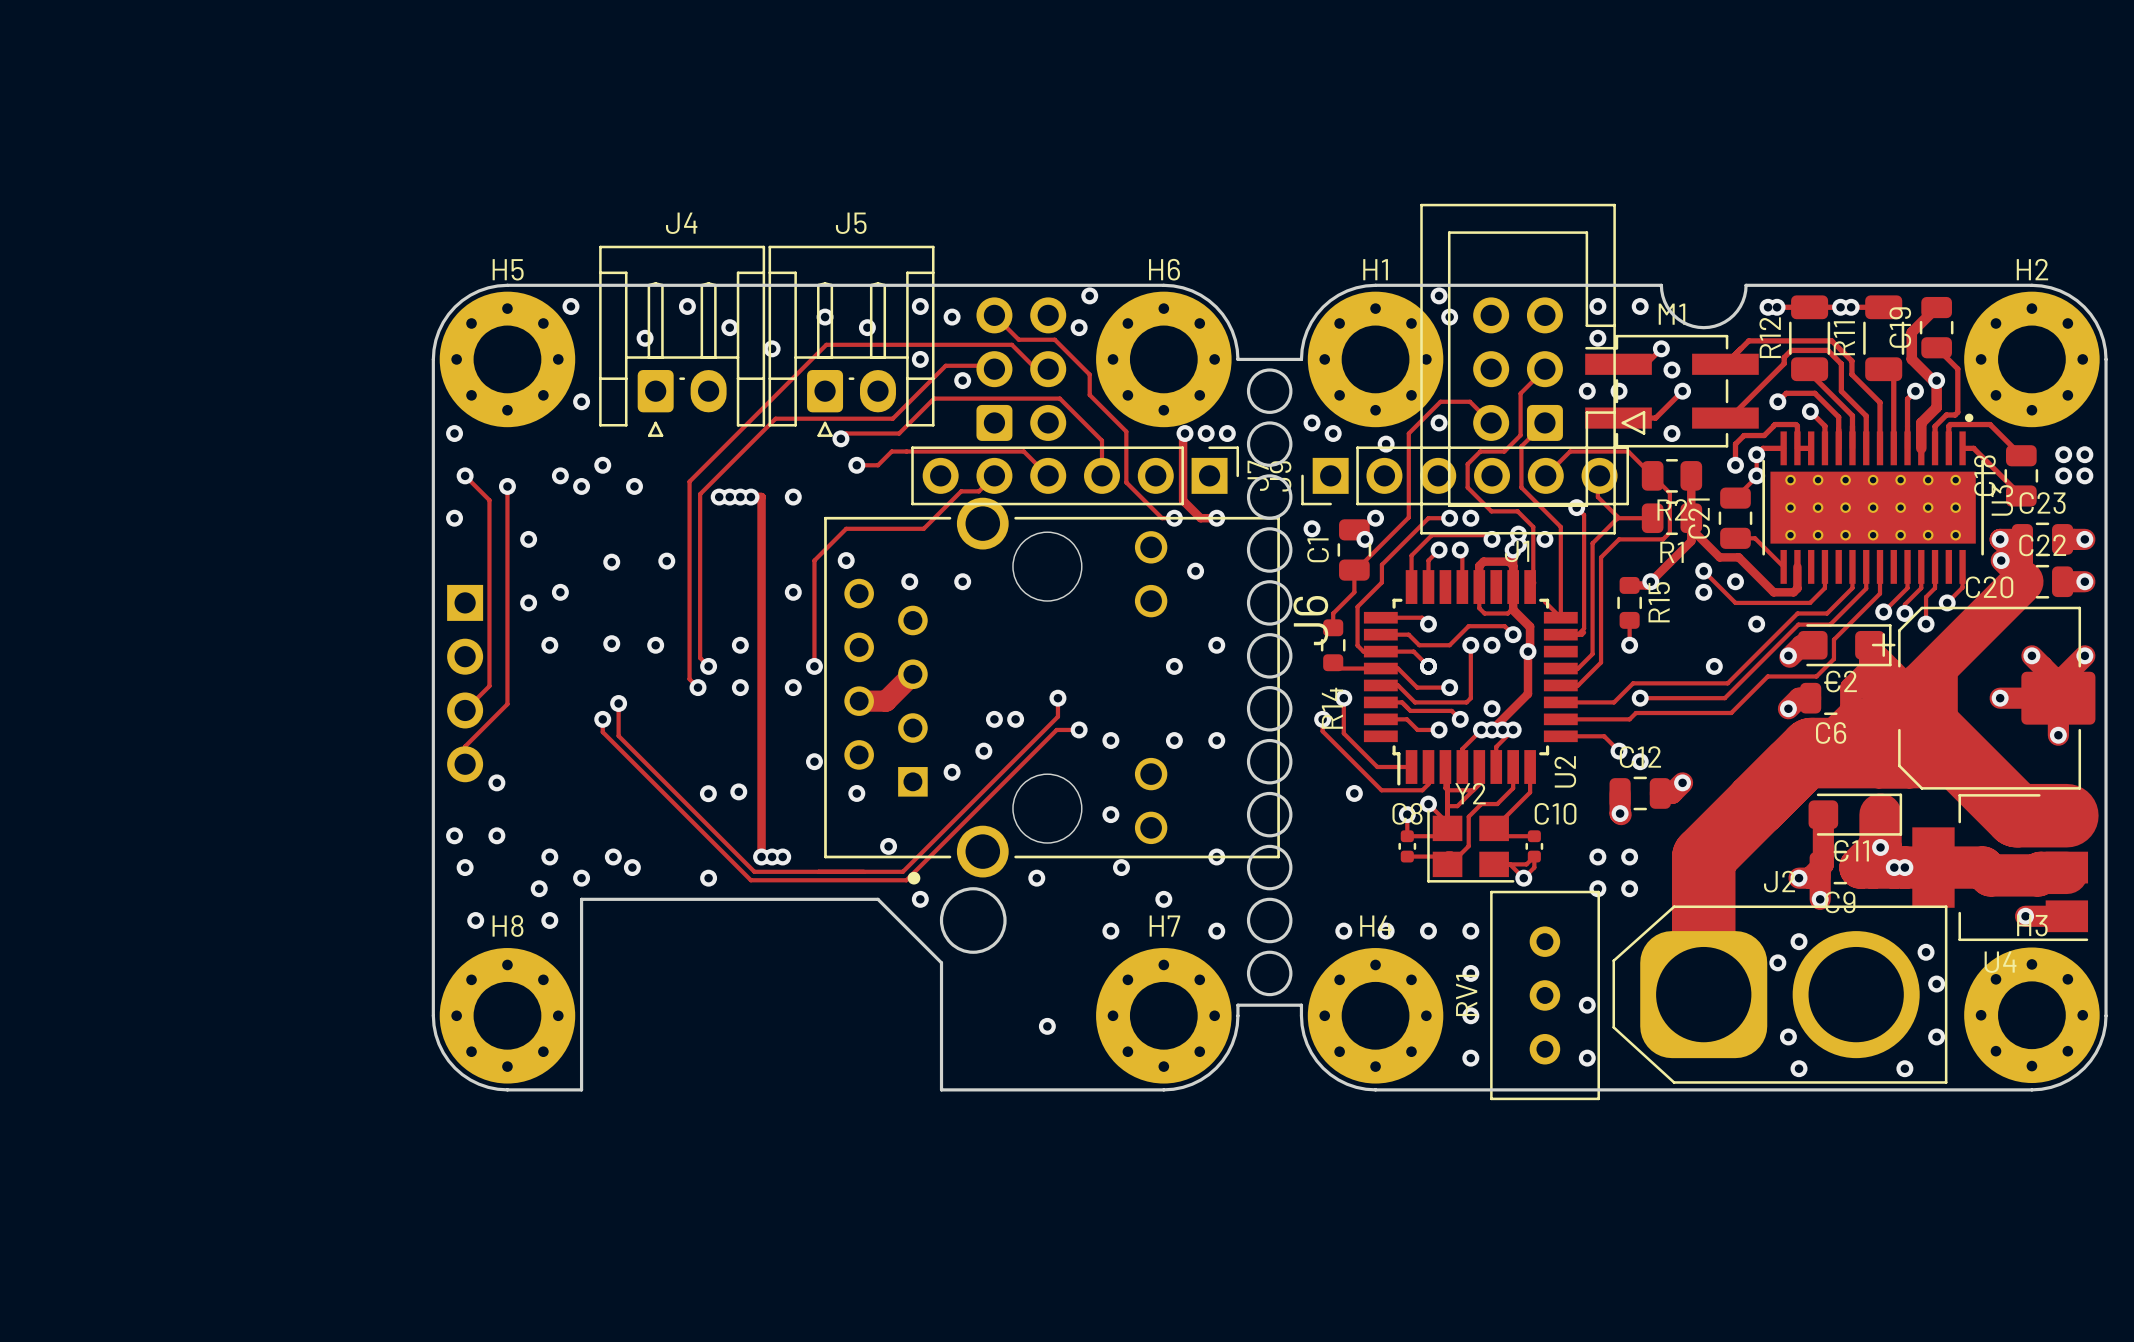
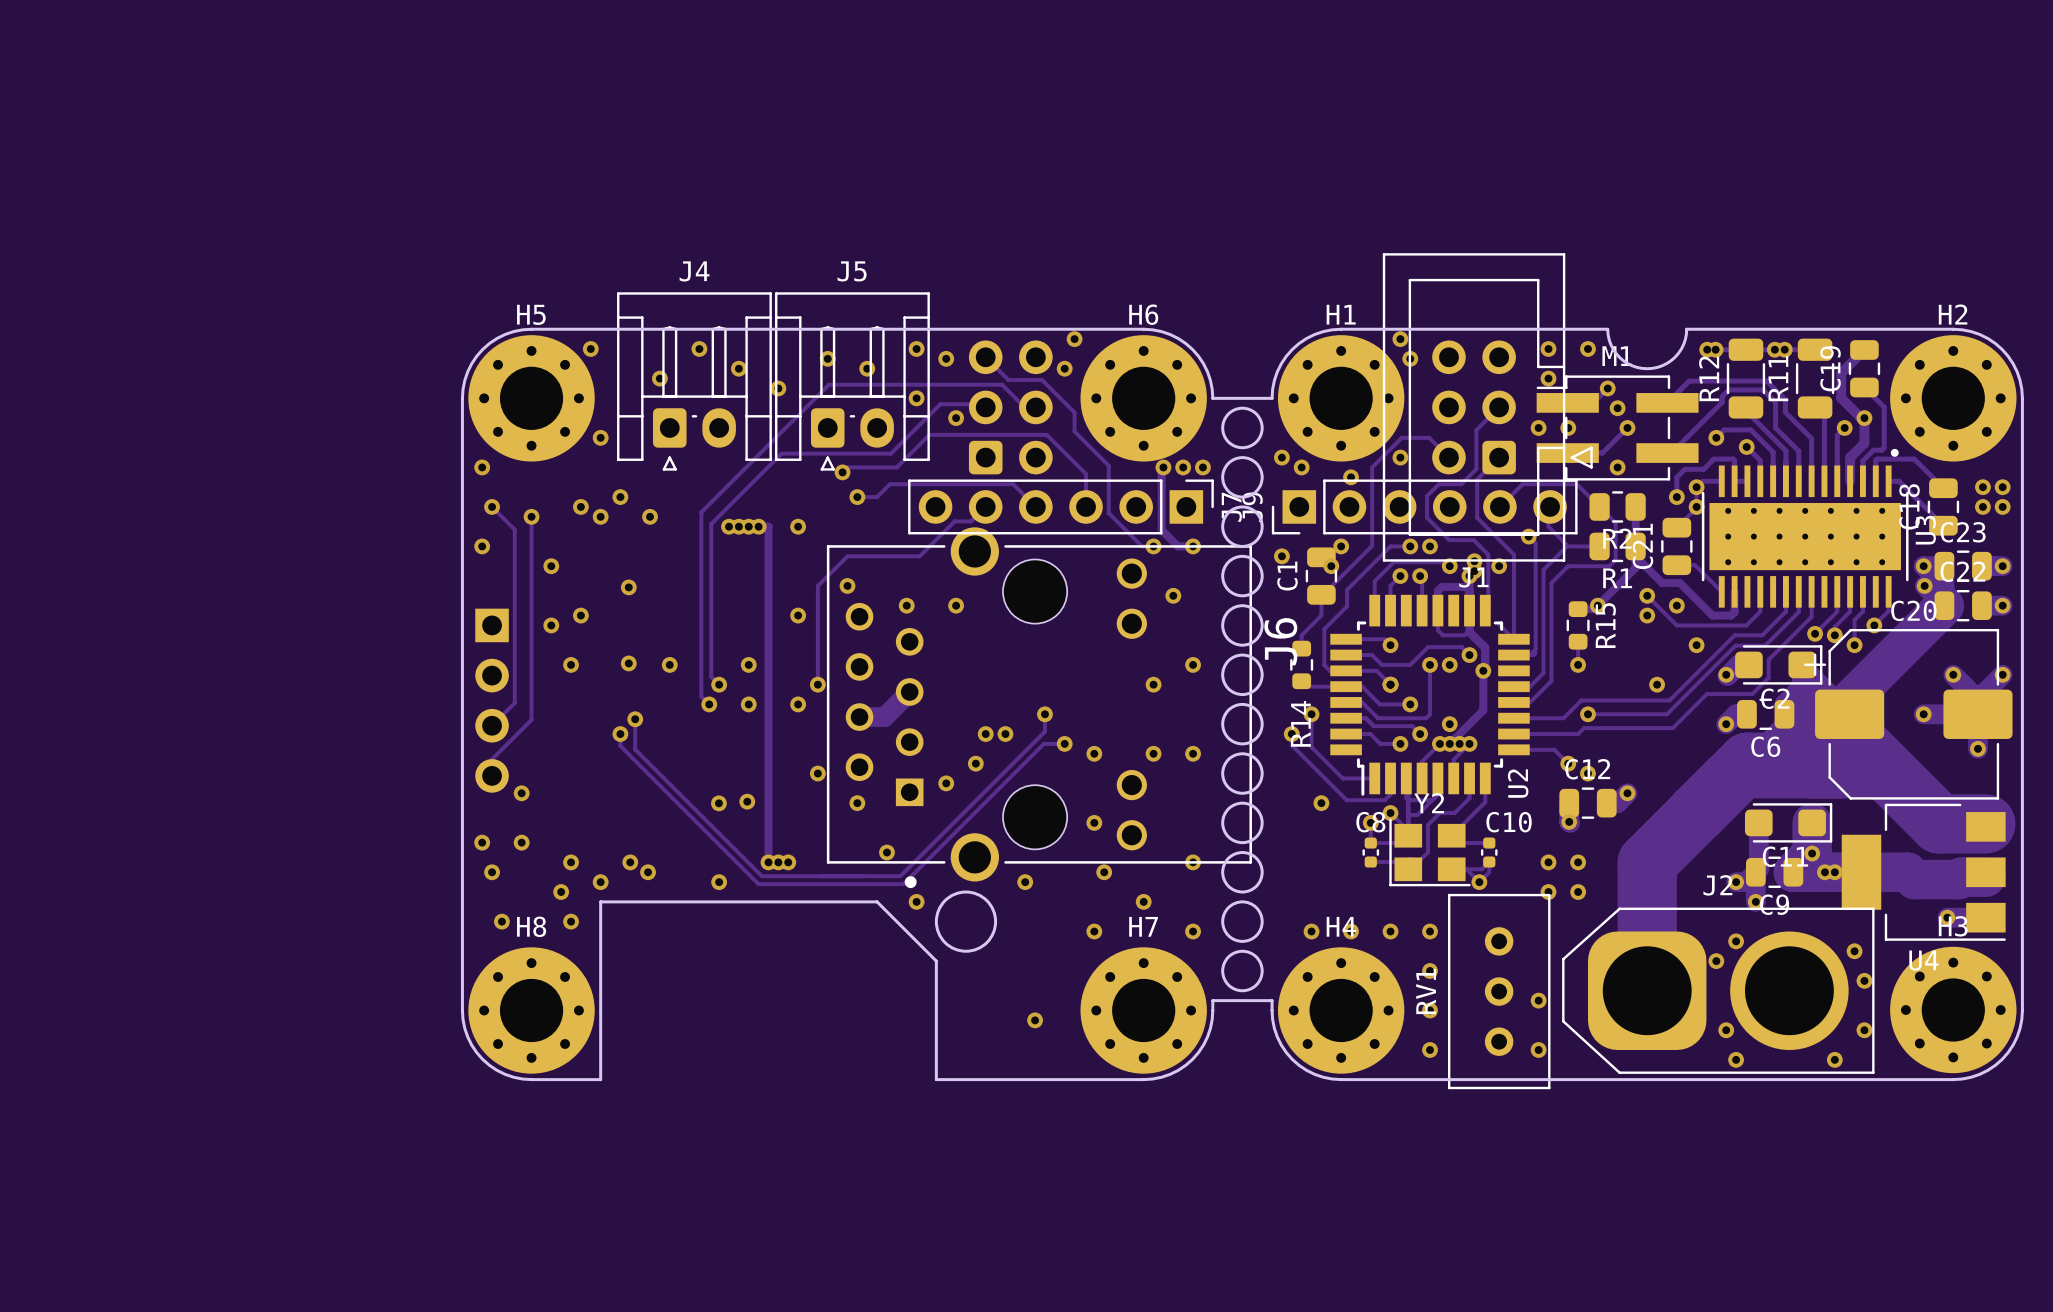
via: (666, 561) -> none

